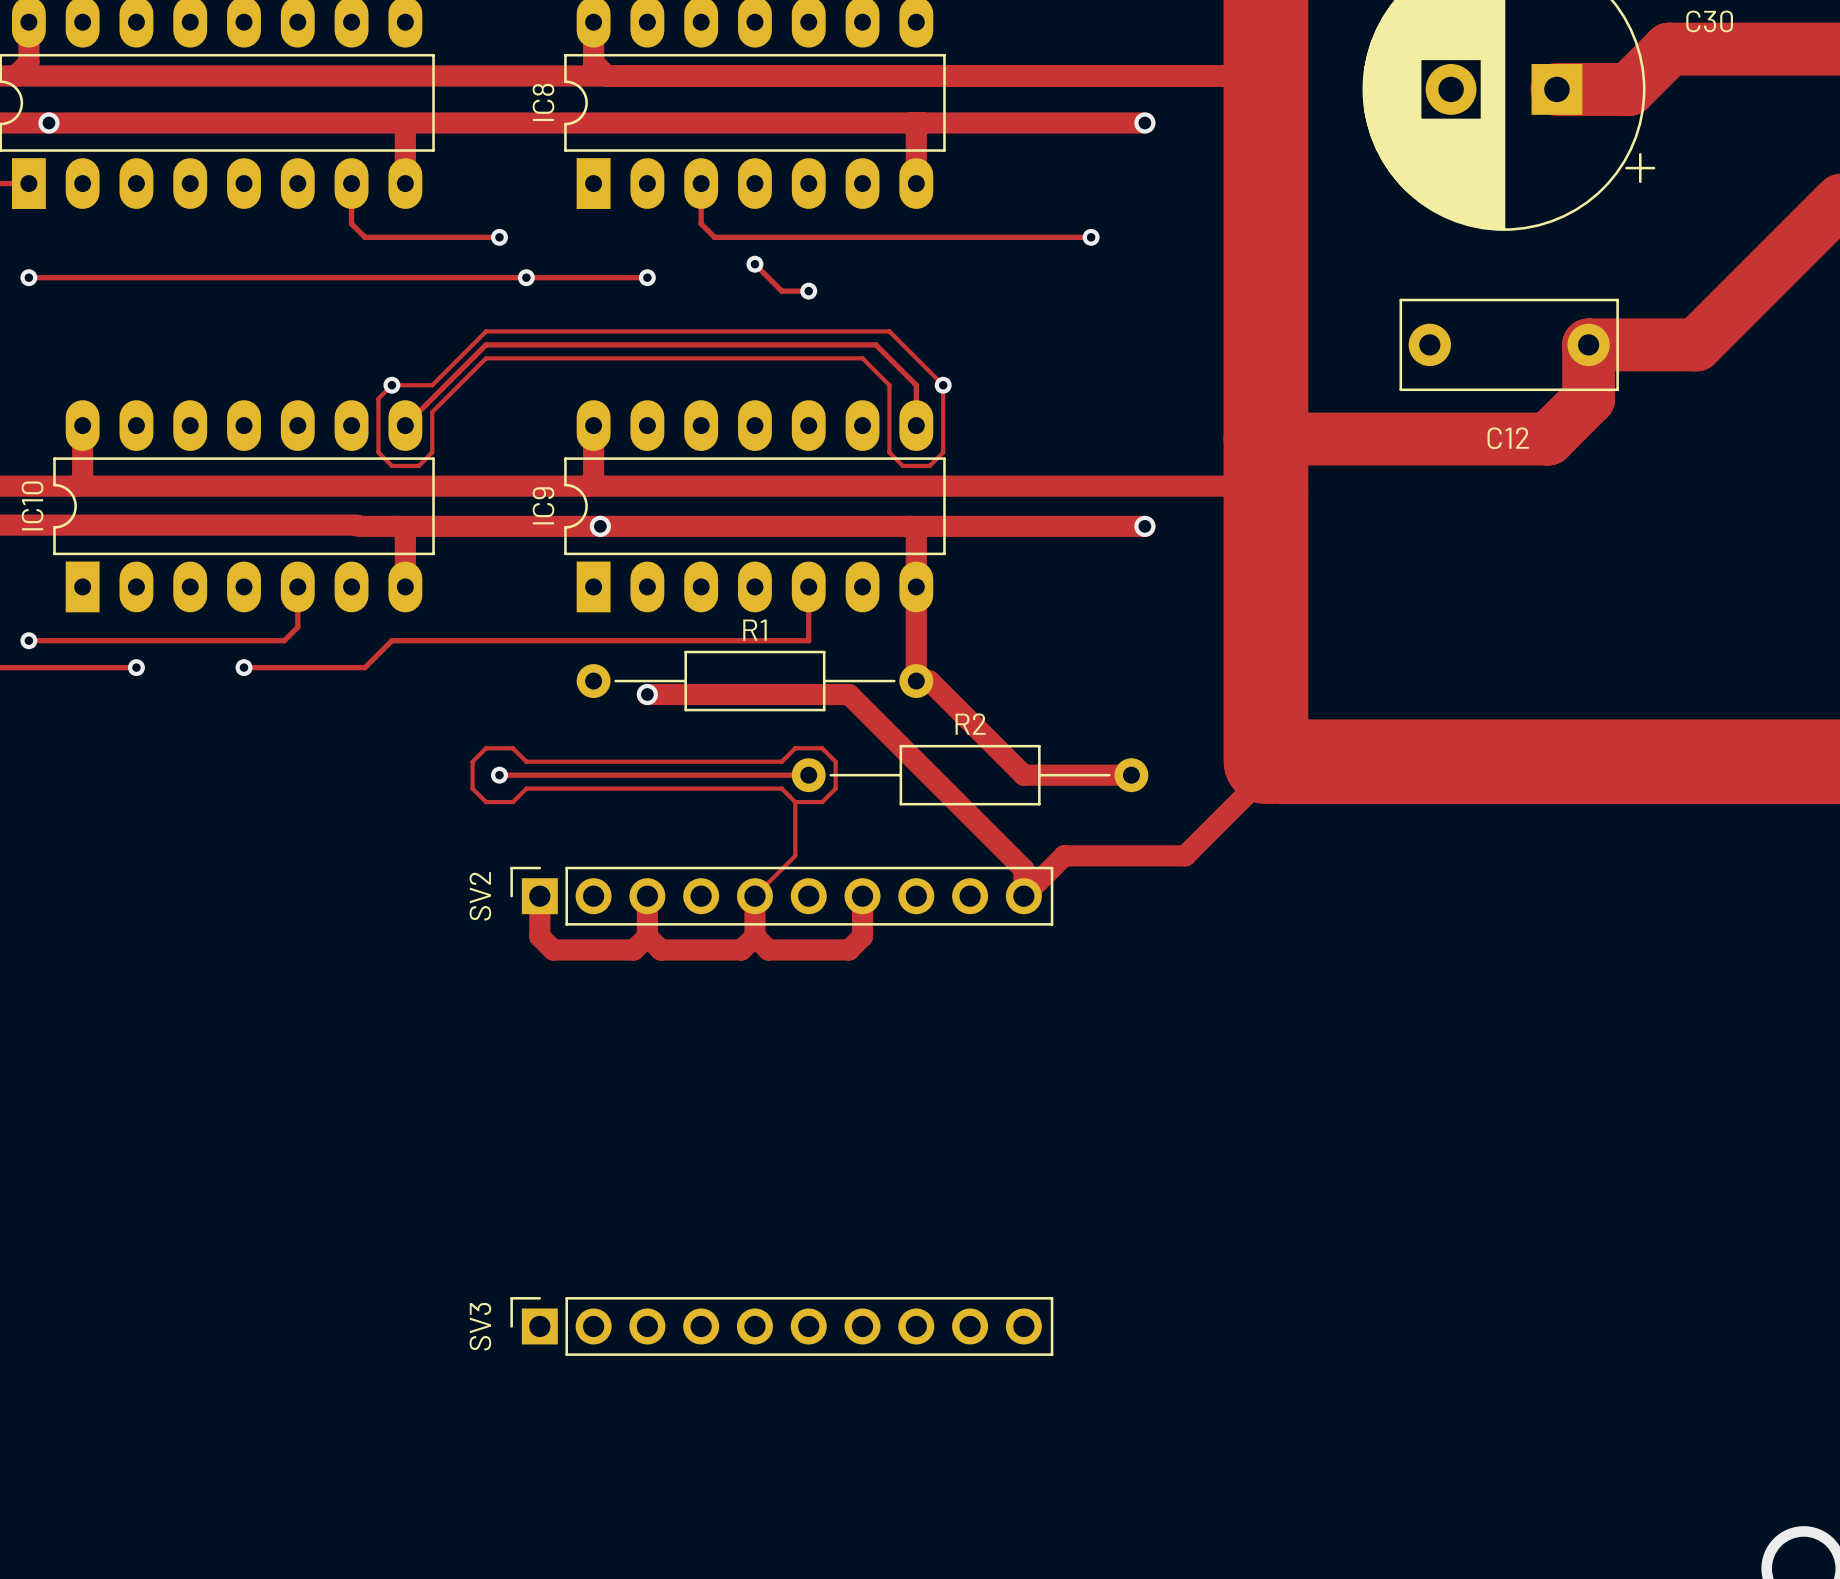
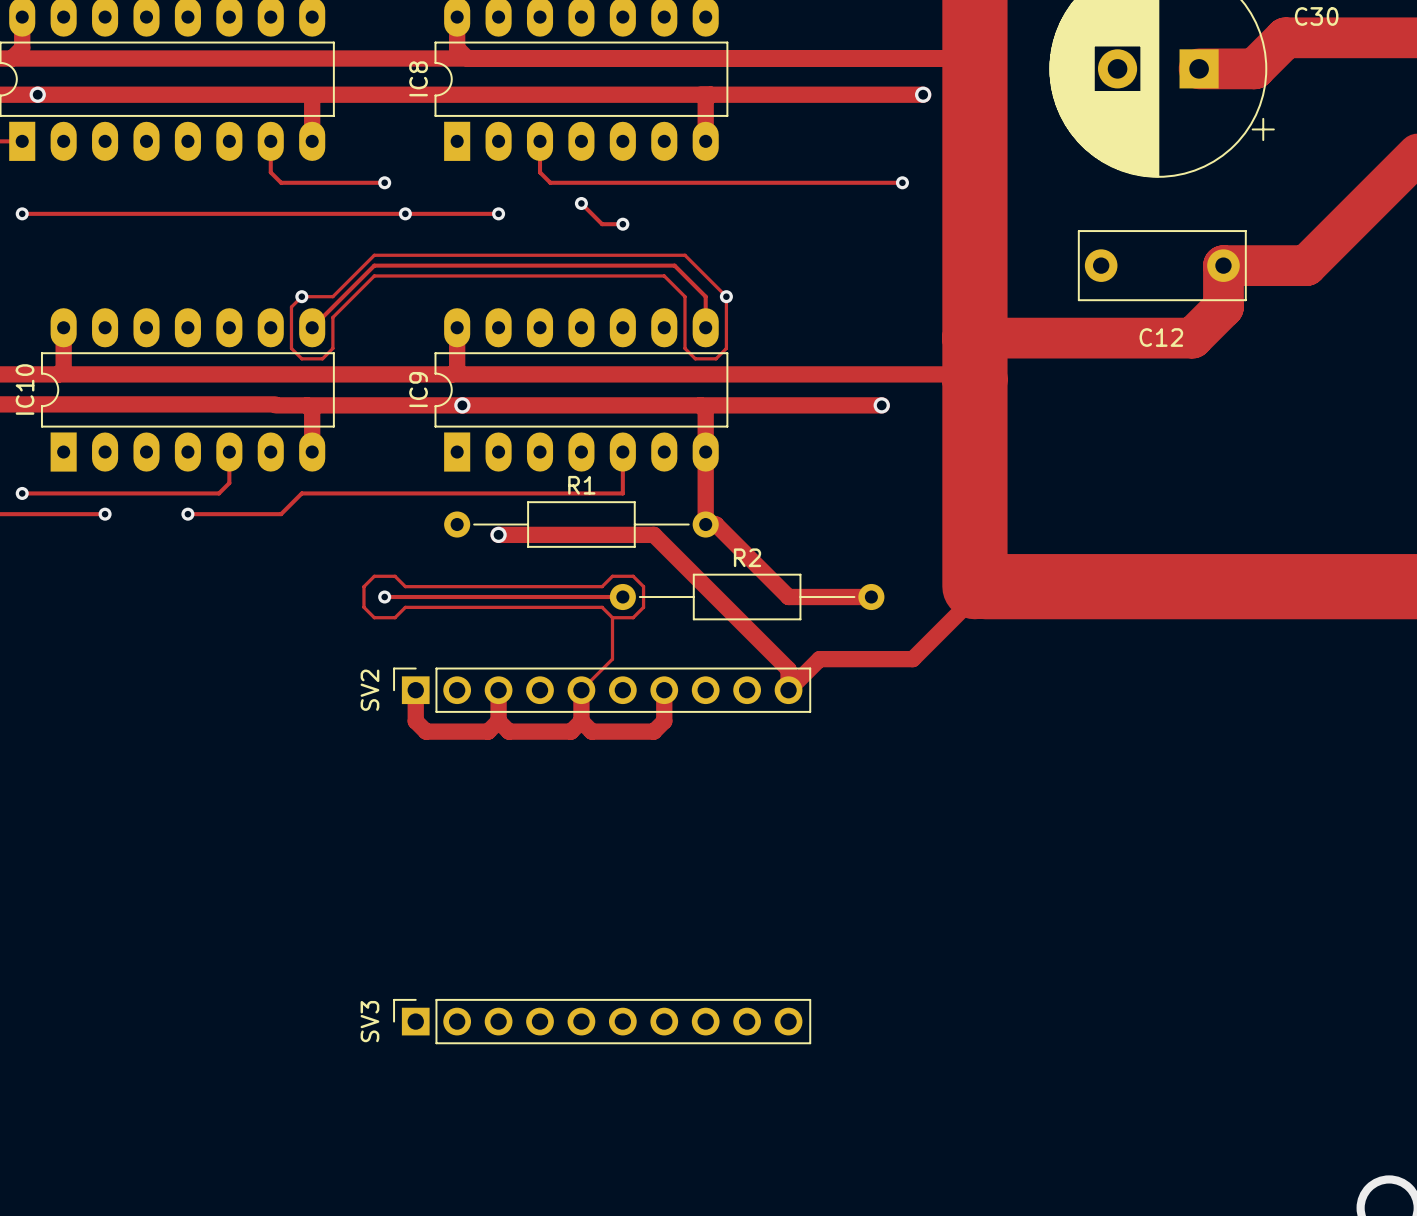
track: none -> (881, 94) (923, 94)
via position: (1144, 122) -> (923, 94)
track: none -> (840, 182) (902, 182)
via position: (1091, 237) -> (902, 182)

